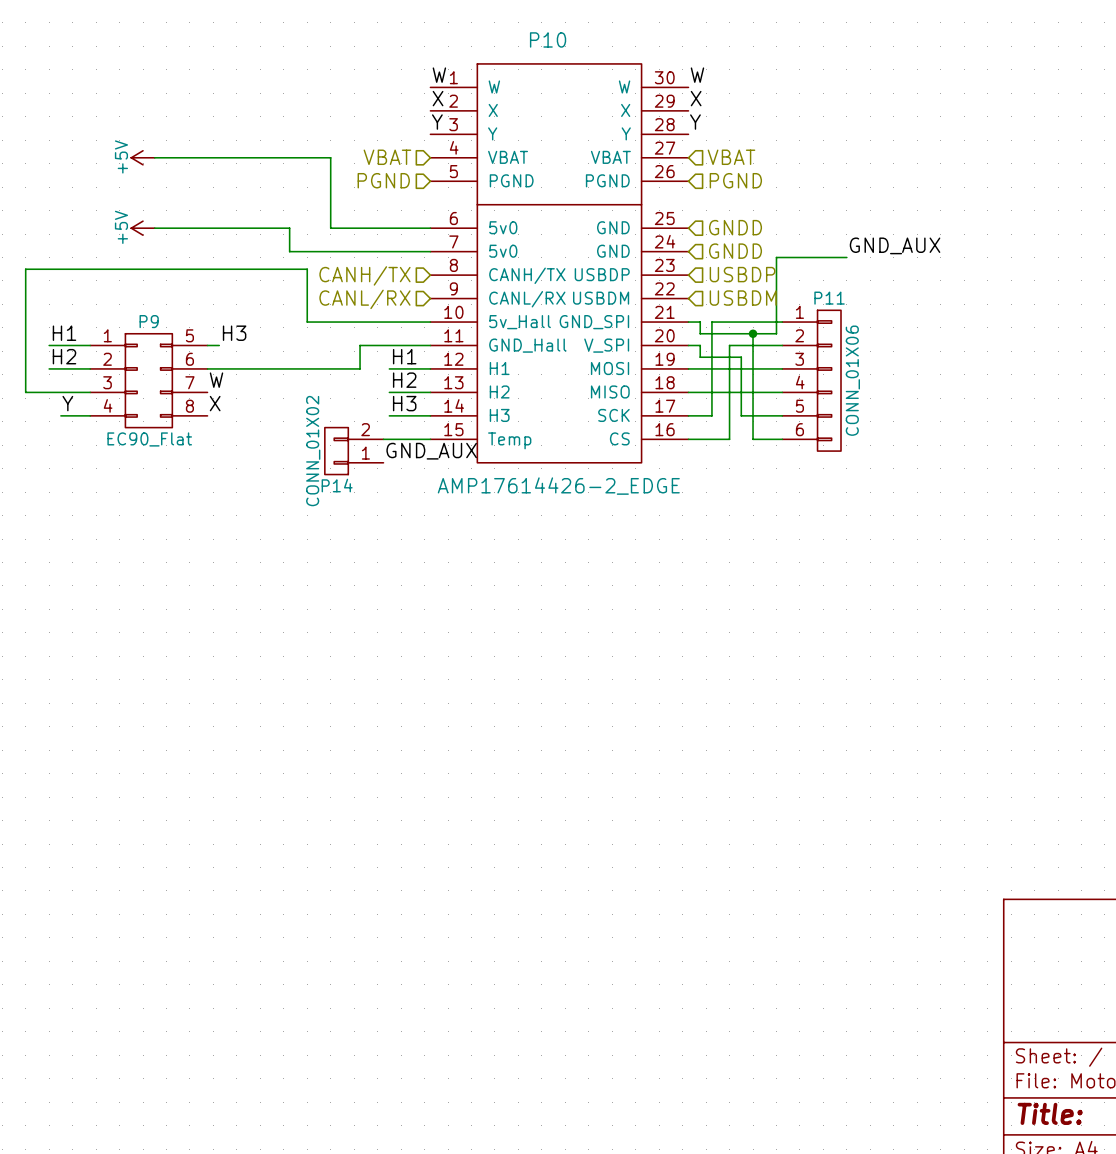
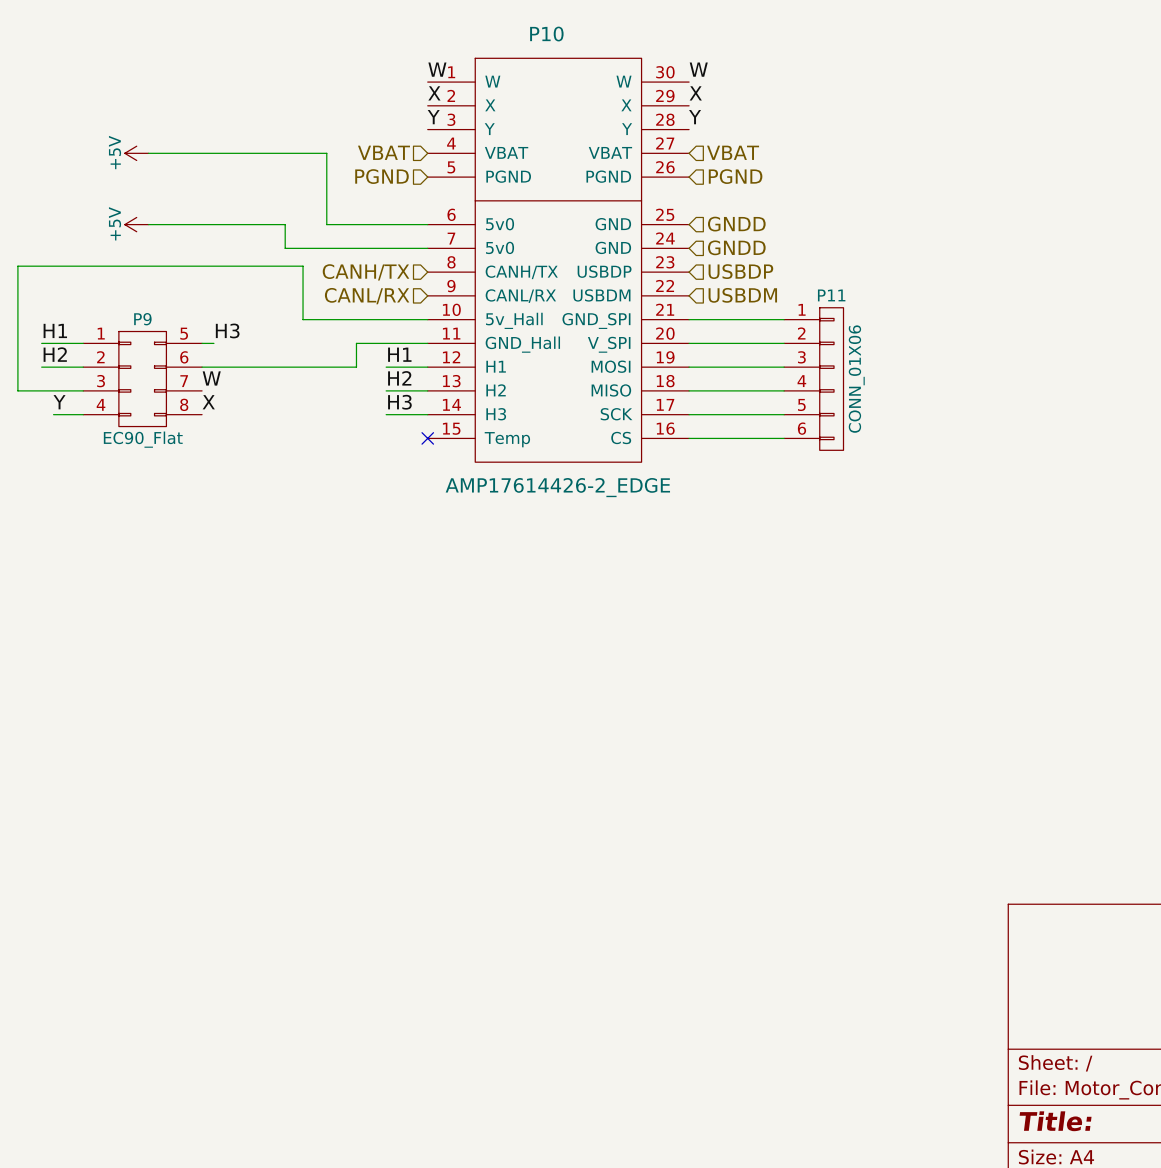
label: GND_AUX (895, 245) -> none
wire: (846, 257) (776, 257) (776, 333) (700, 333) (700, 322) -> none
wire: (711, 322) (711, 415) -> (712, 319) (700, 319)
wire: (753, 333) (753, 439) -> none
junction: (753, 333) -> none
wire: (700, 345) (700, 357) (741, 357) (741, 415) -> (712, 414) (742, 414)
wire: none -> (700, 343) (730, 343)
wire: (729, 345) (729, 439) -> (754, 438) (730, 438)
wire: (383, 439) (430, 439) -> none
no-connect mark: none -> (427, 438)
P14: CONN_01X02 (354, 451) -> none
label: GND_AUX (431, 451) -> none

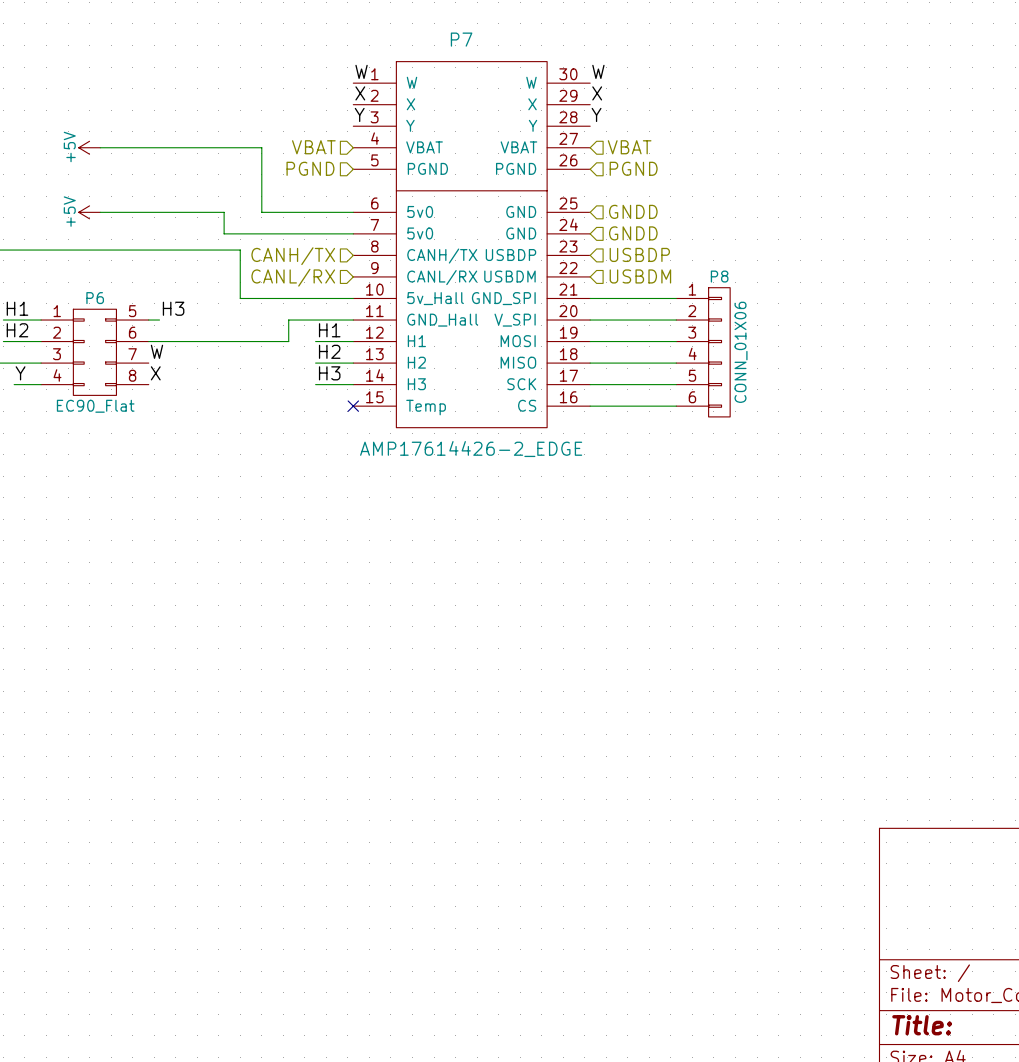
P10 name: P10 (546, 34) -> P7 (461, 39)
P11 name: P11 (831, 295) -> P8 (719, 276)
P9 name: P9 (142, 319) -> P6 (95, 298)

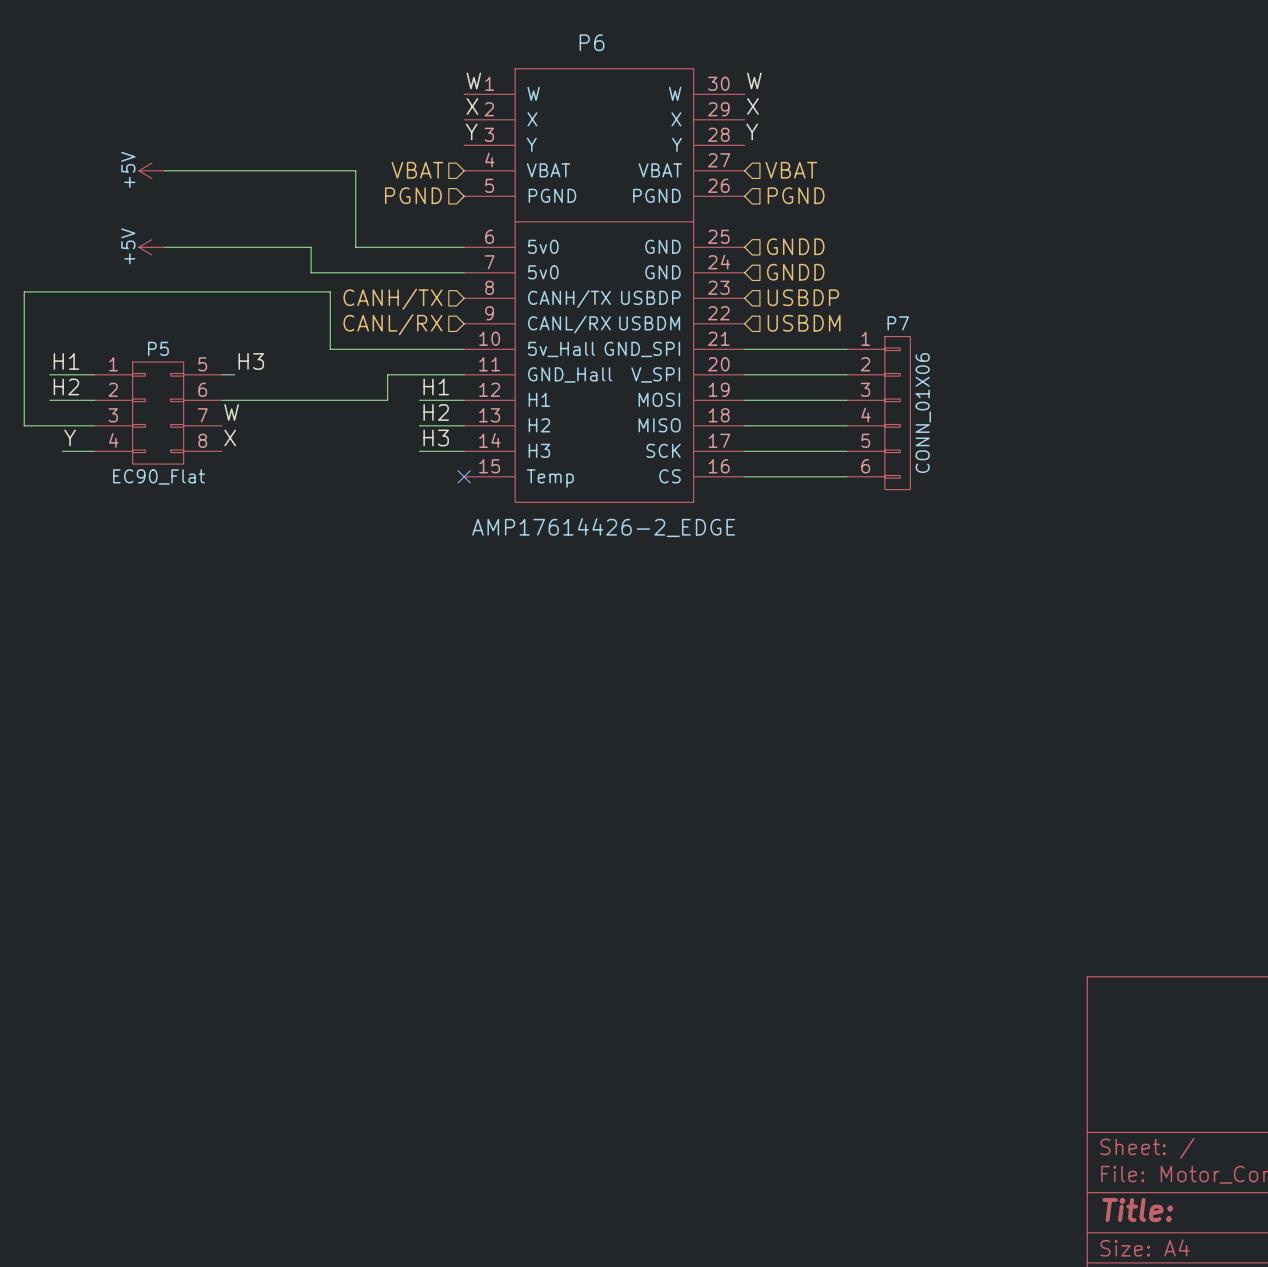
P7 name: P7 (461, 39) -> P6 (592, 42)
P8 name: P8 (719, 276) -> P7 (898, 323)
P6 name: P6 (95, 298) -> P5 (158, 348)

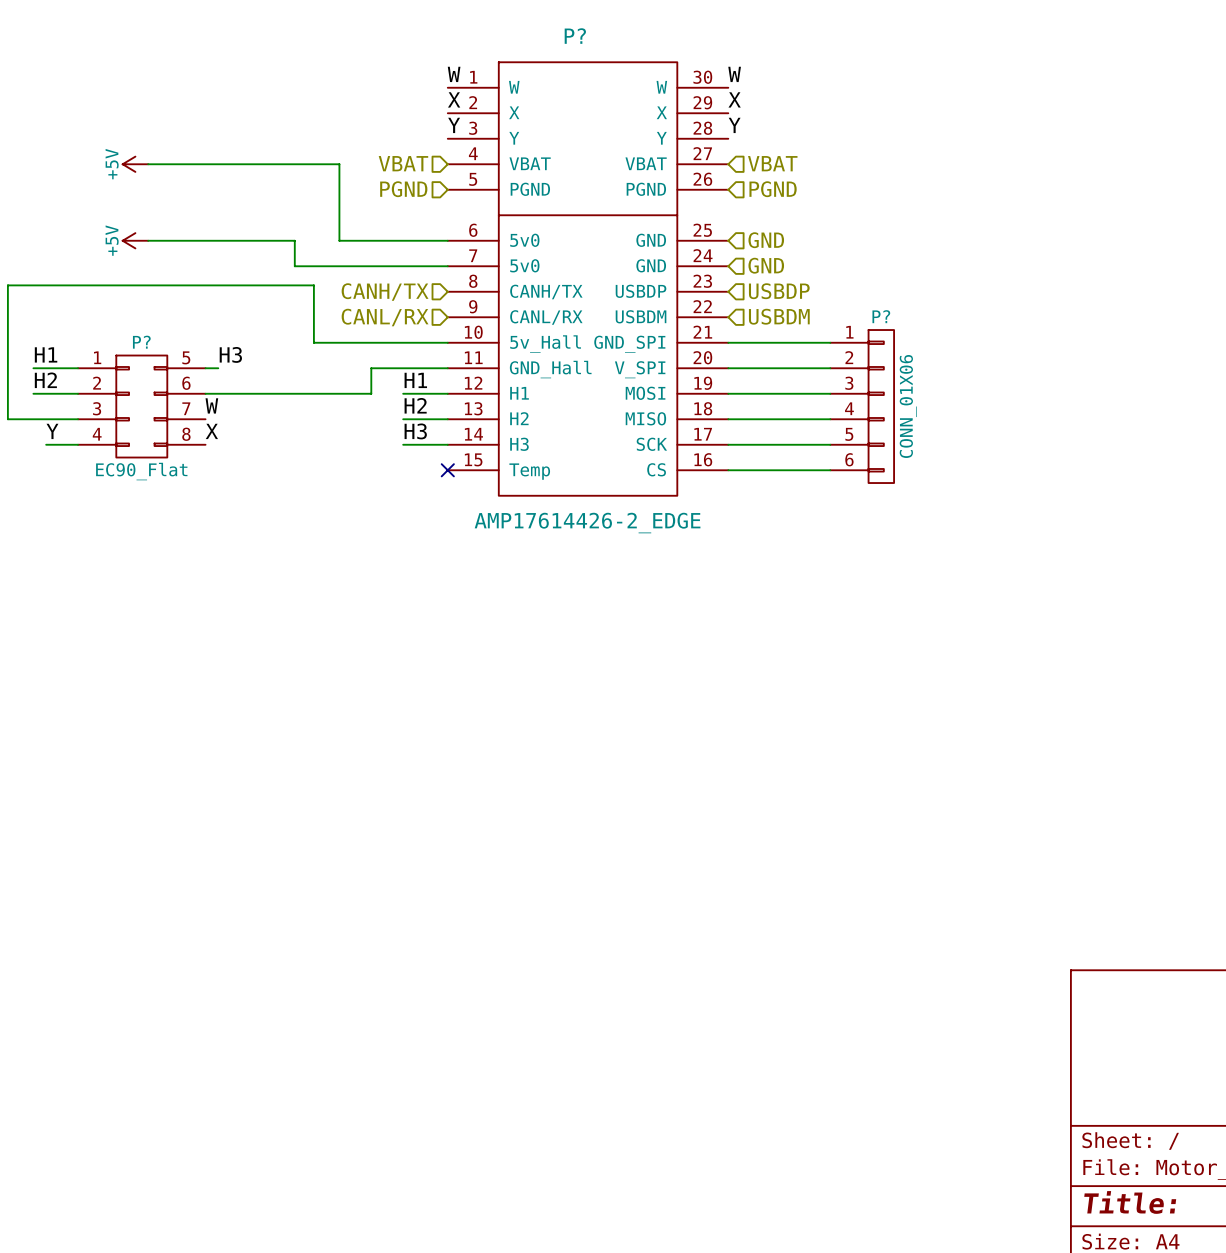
P6 name: P6 (592, 42) -> P? (575, 36)
hierarchical label: GNDD (795, 246) -> GND (766, 240)
hierarchical label: GNDD (795, 272) -> GND (766, 265)
P7 name: P7 (898, 323) -> P? (881, 316)
P5 name: P5 (158, 348) -> P? (141, 342)

